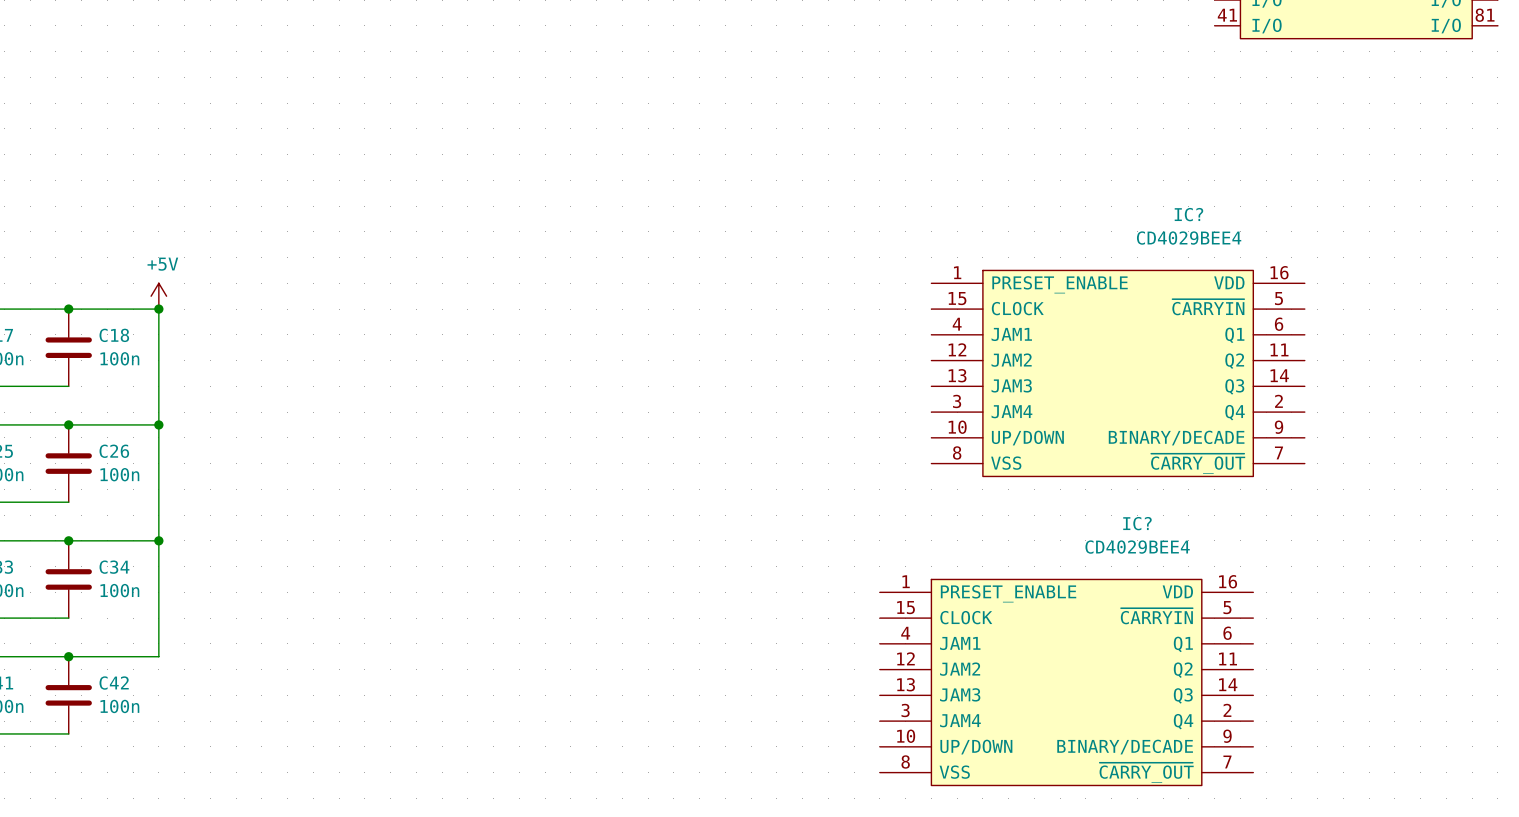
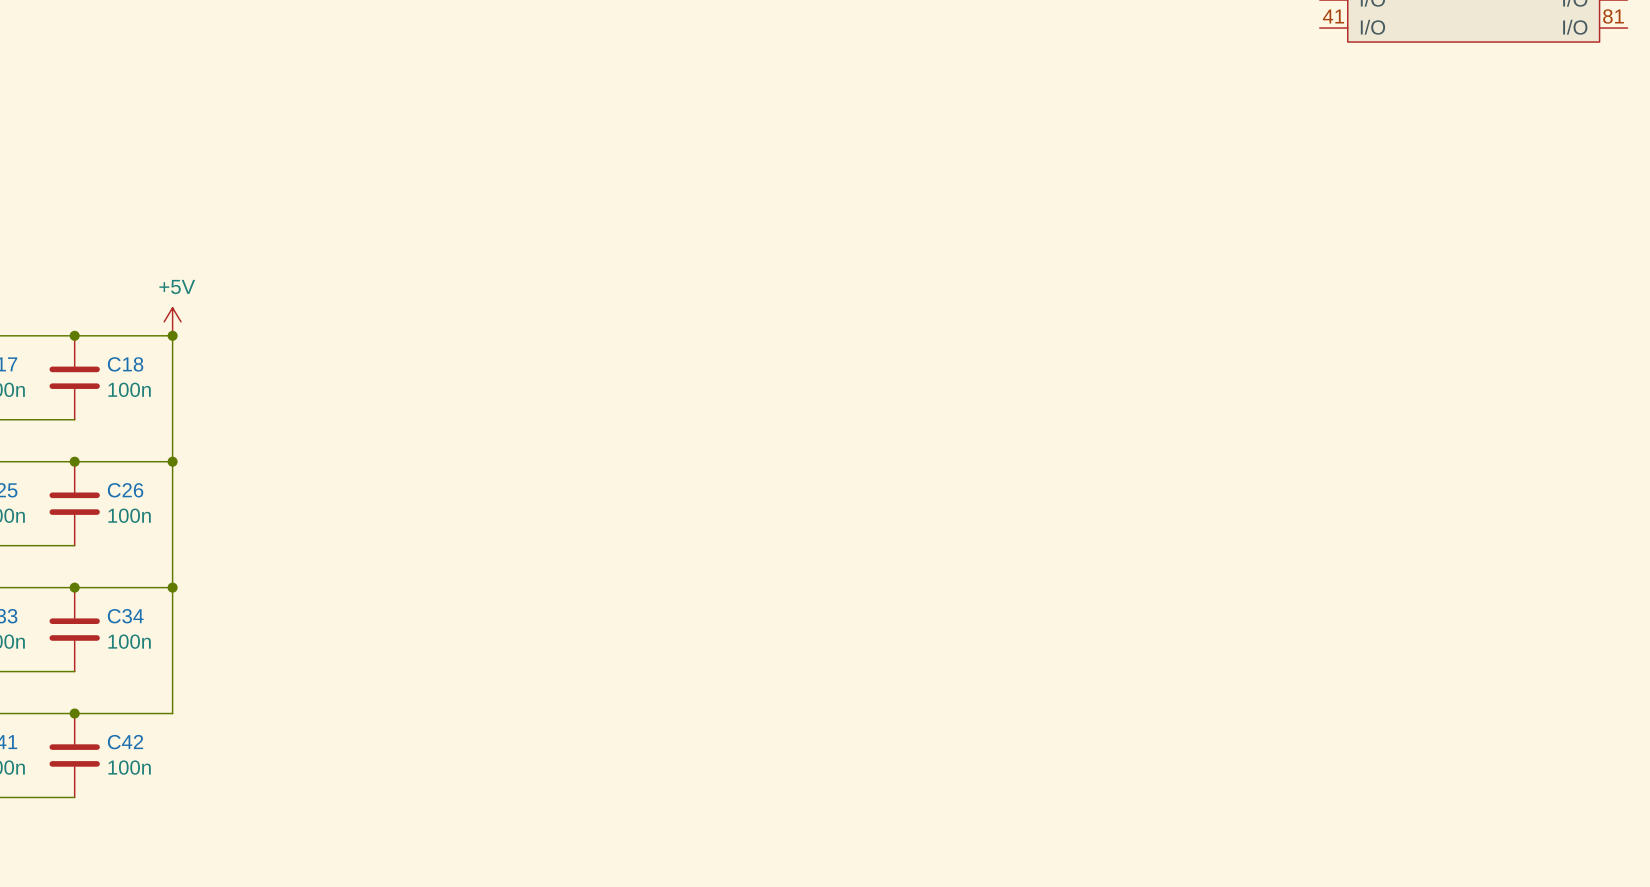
IC?: CD4029BEE4 (1118, 373) -> none
IC?: CD4029BEE4 (1066, 682) -> none

